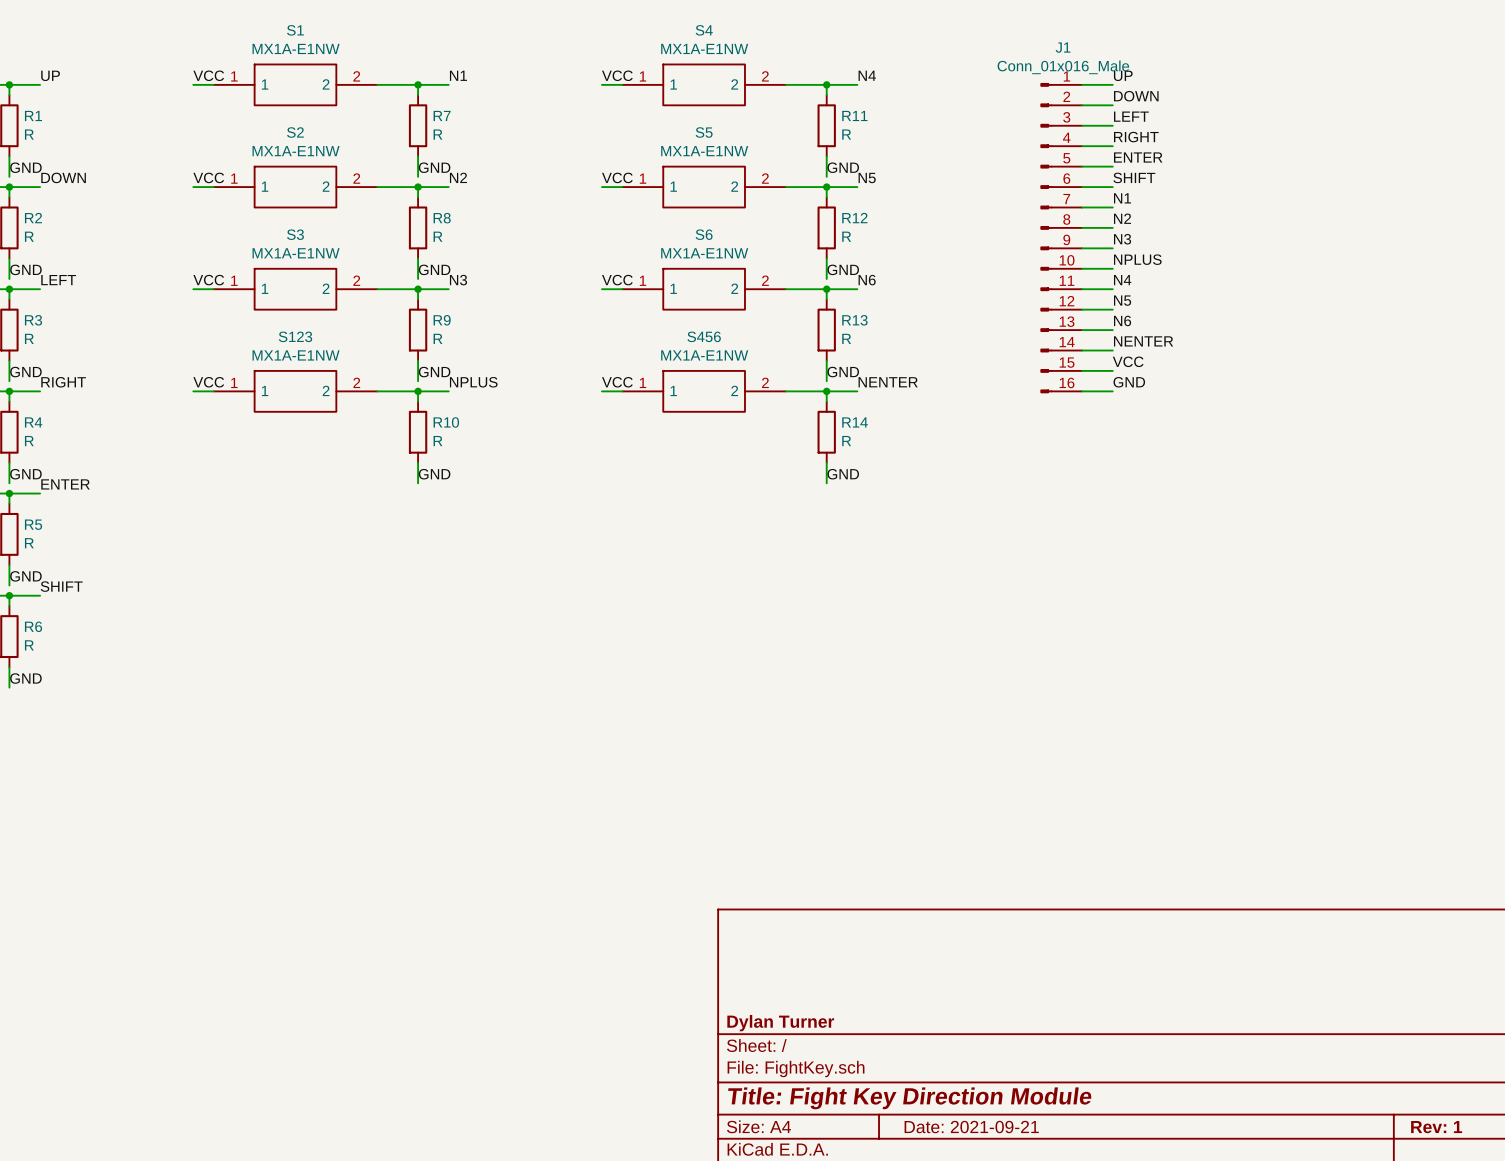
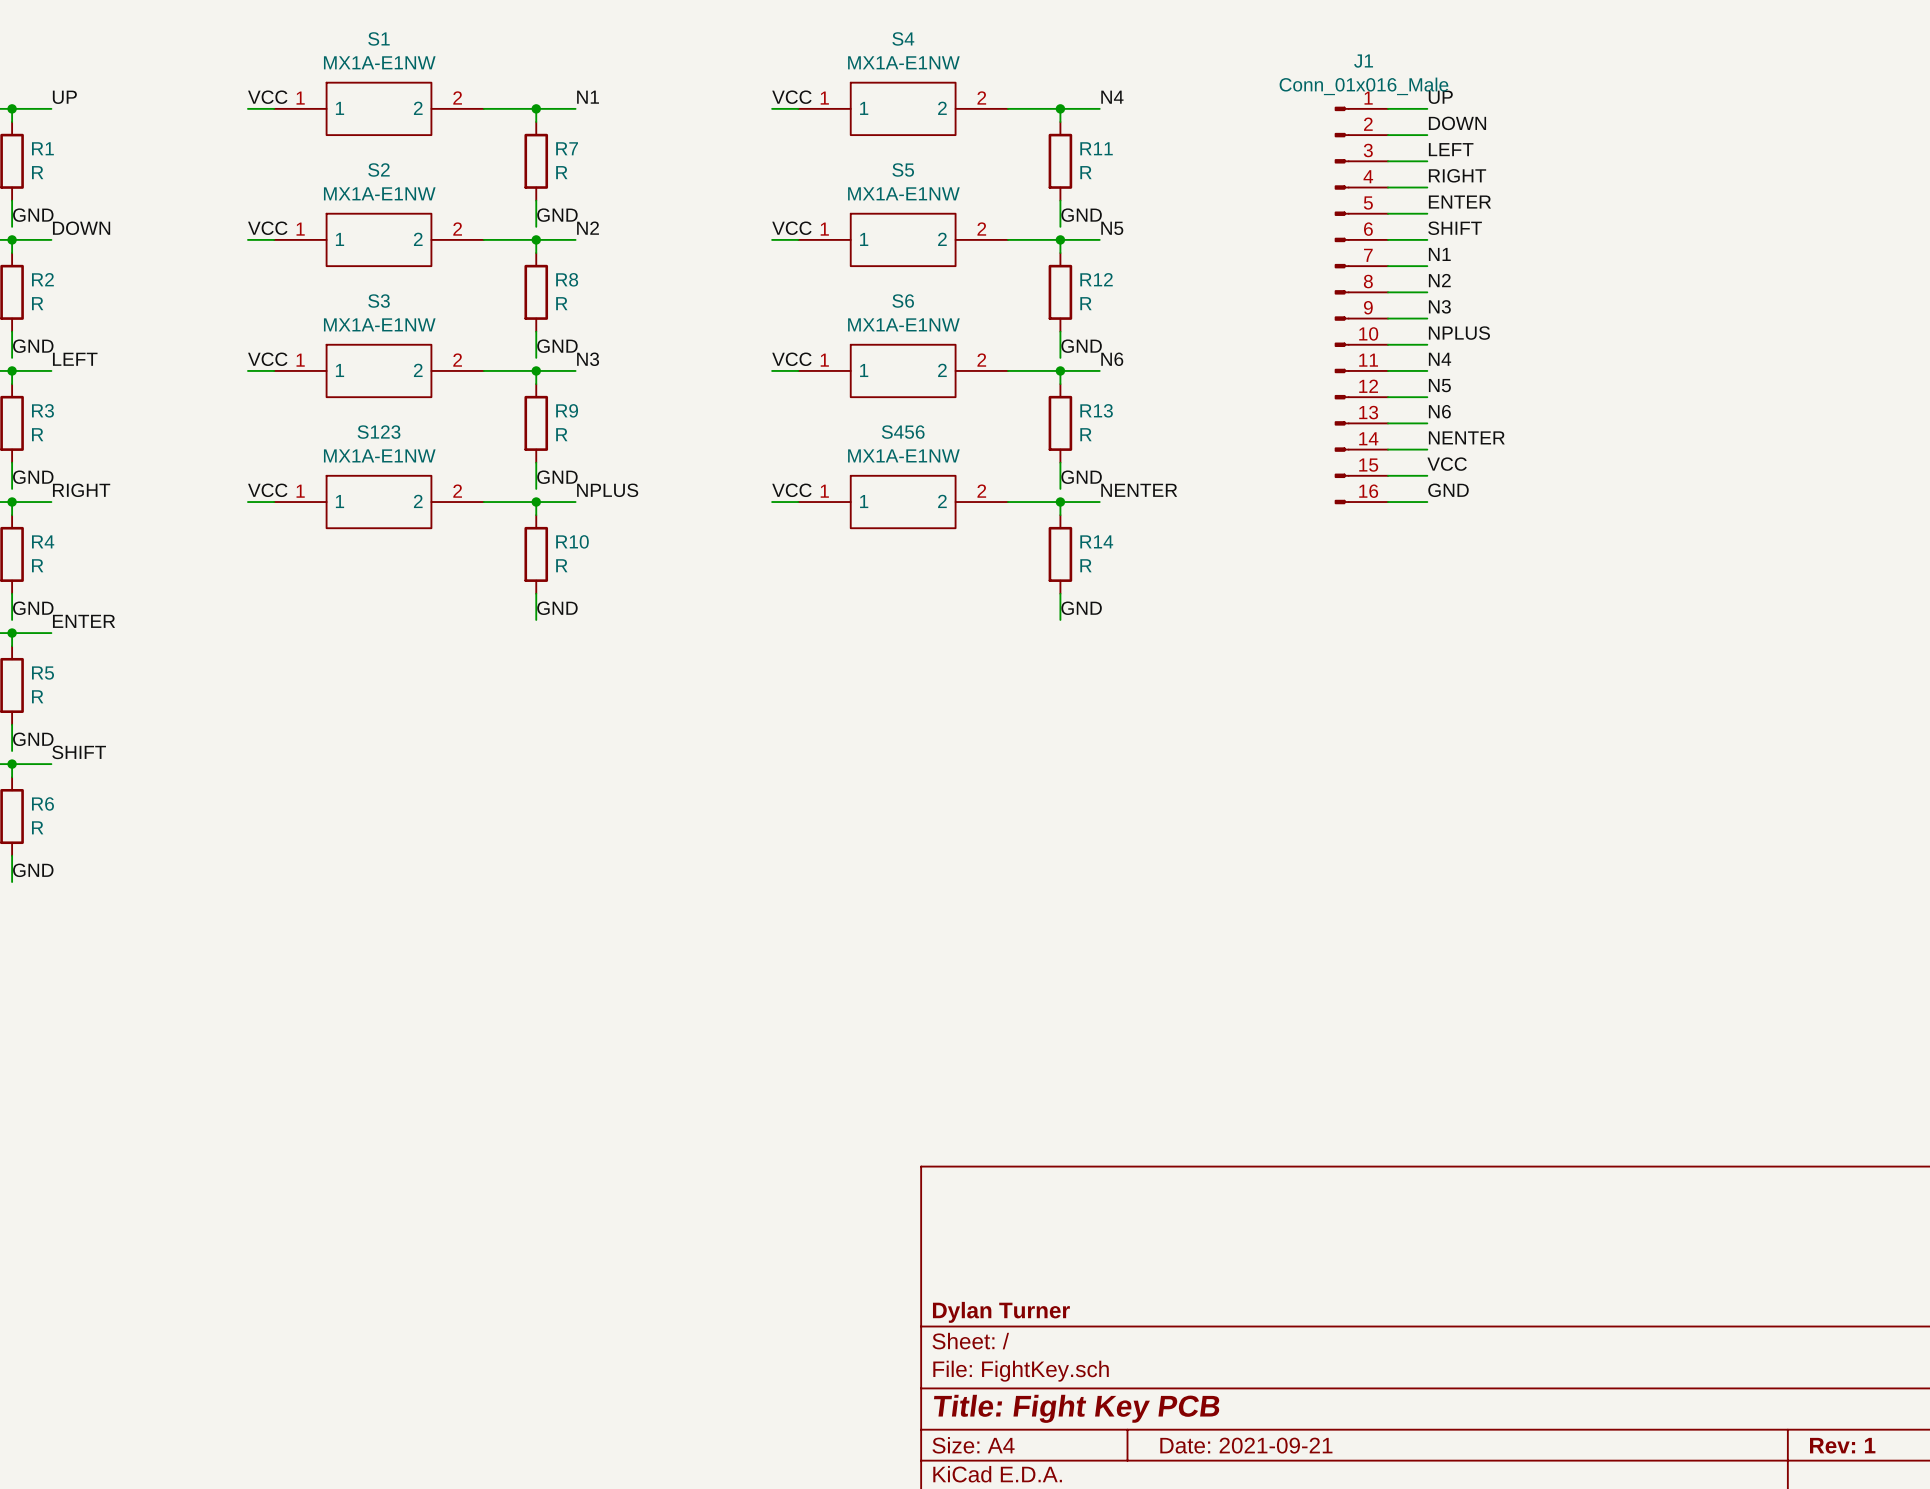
title block: Title: Fight Key Direction Module (909, 1098) -> Title: Fight Key PCB (1076, 1408)

